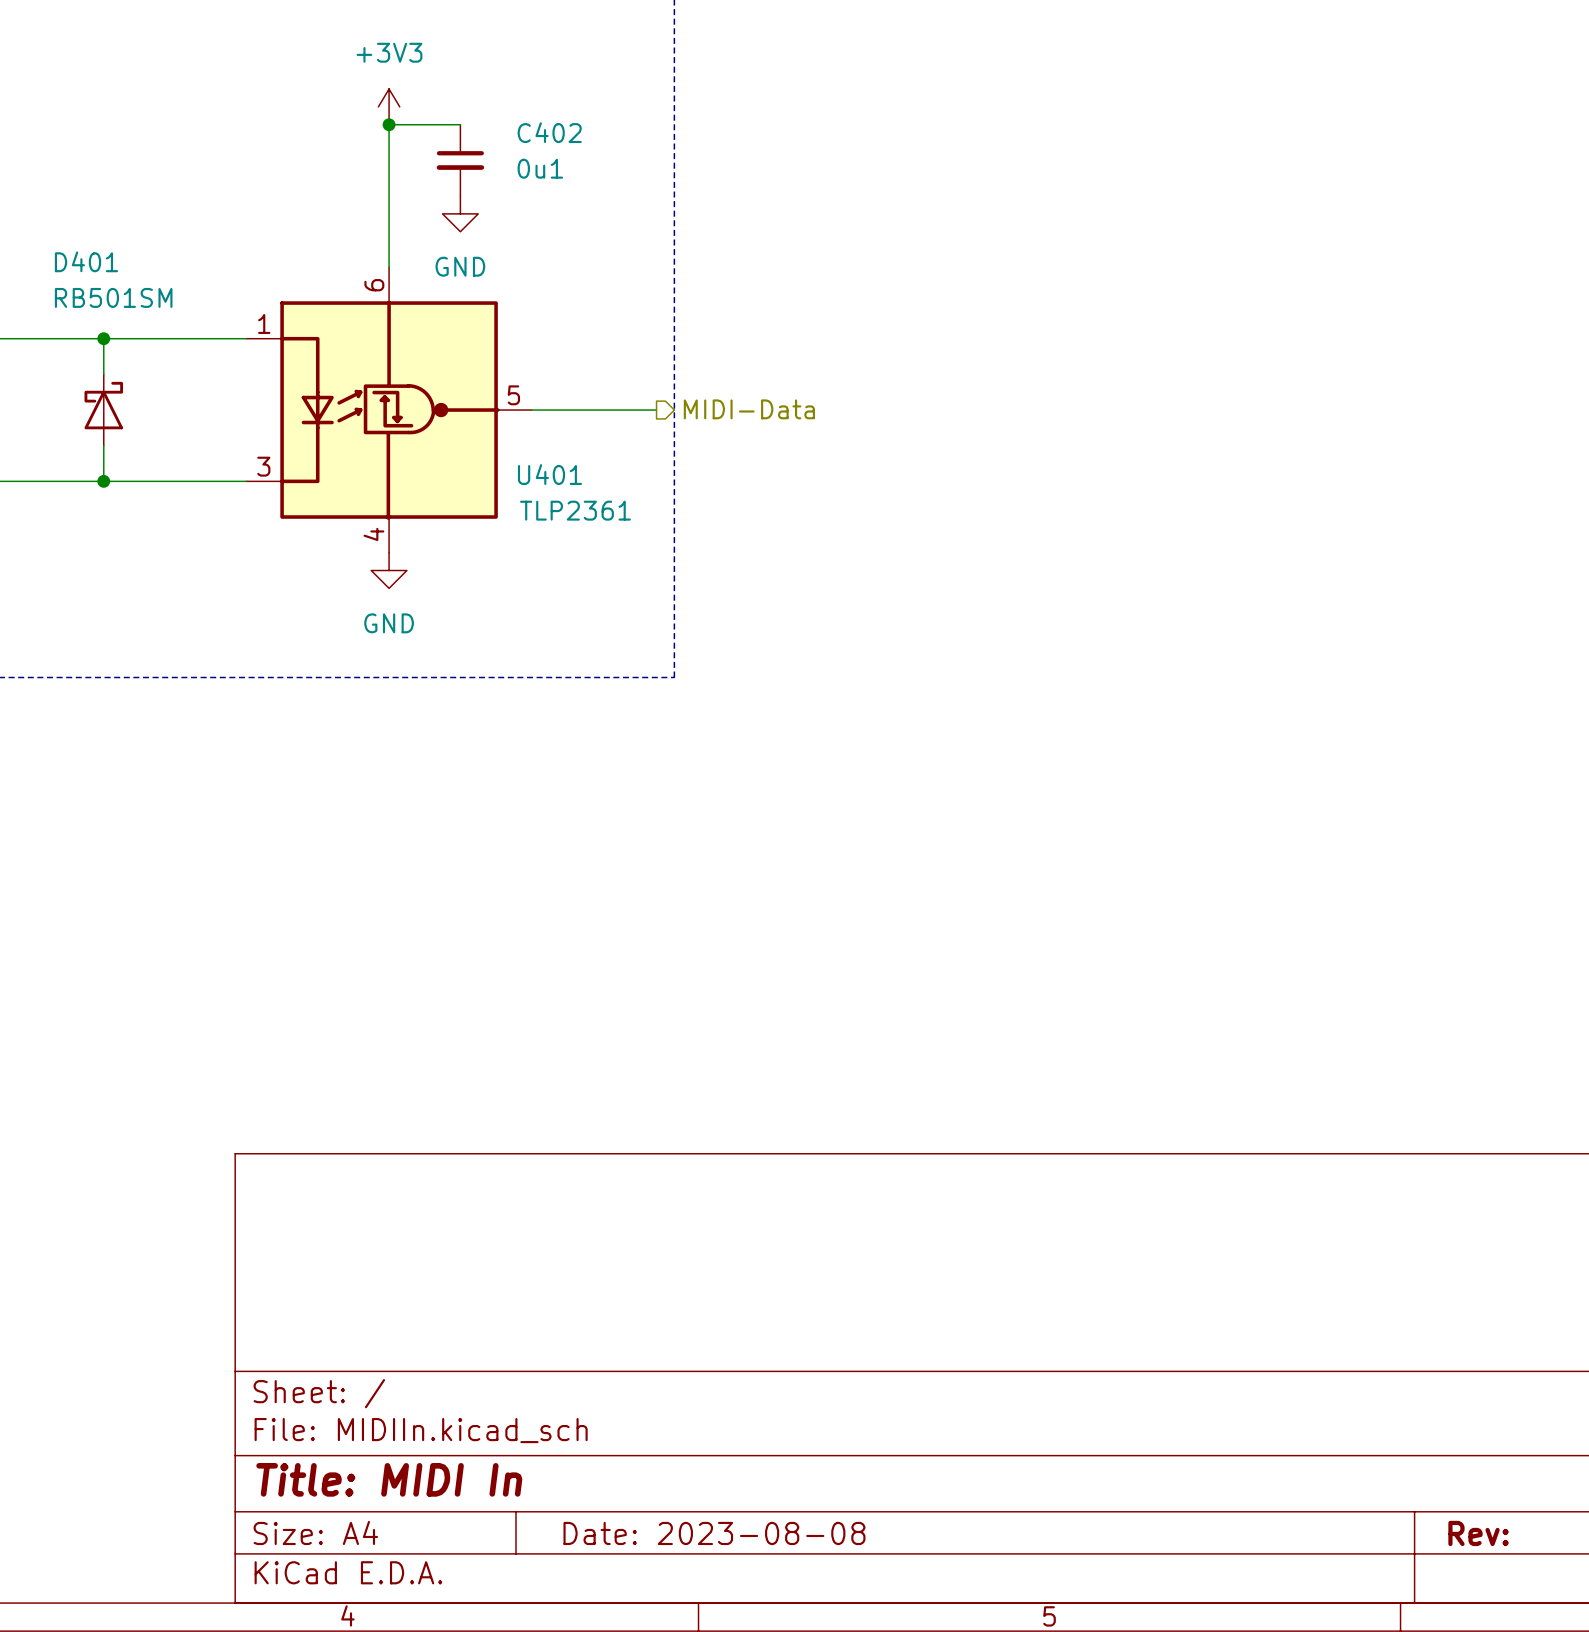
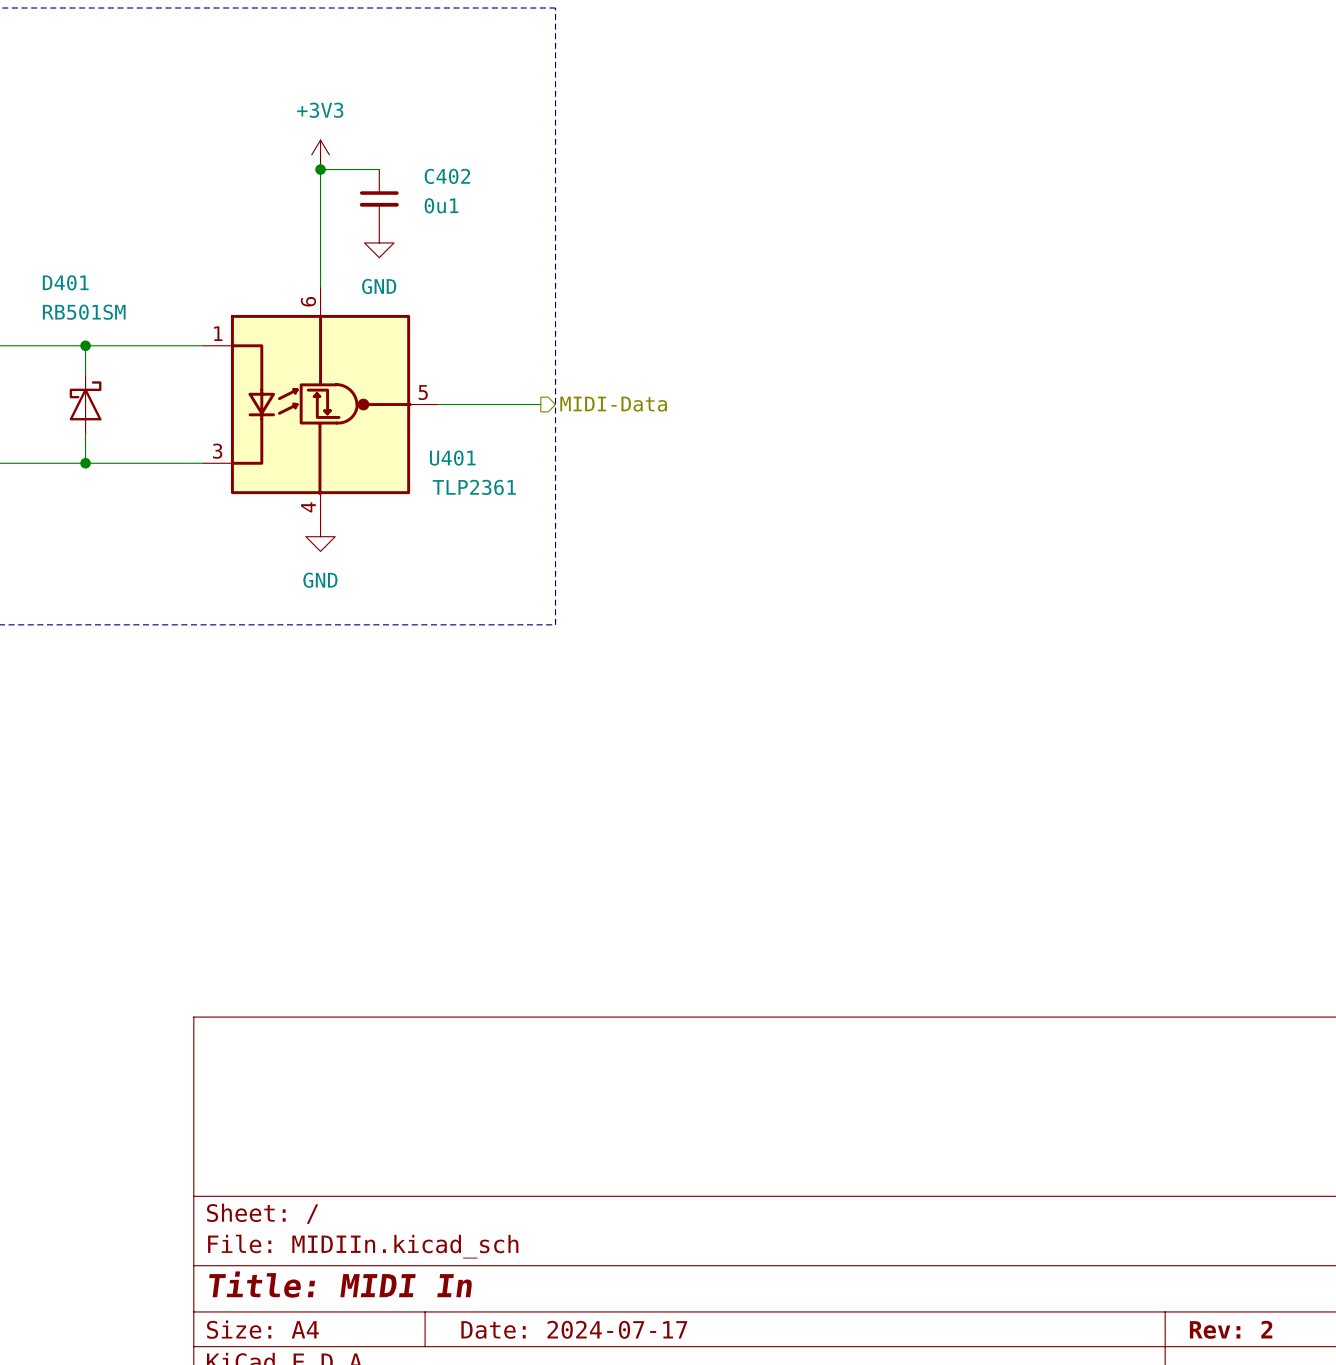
title block: Date: 2023-08-08 (714, 1533) -> Date: 2024-07-17 (574, 1329)
title block: Rev: (1478, 1533) -> Rev: 2 (1231, 1329)

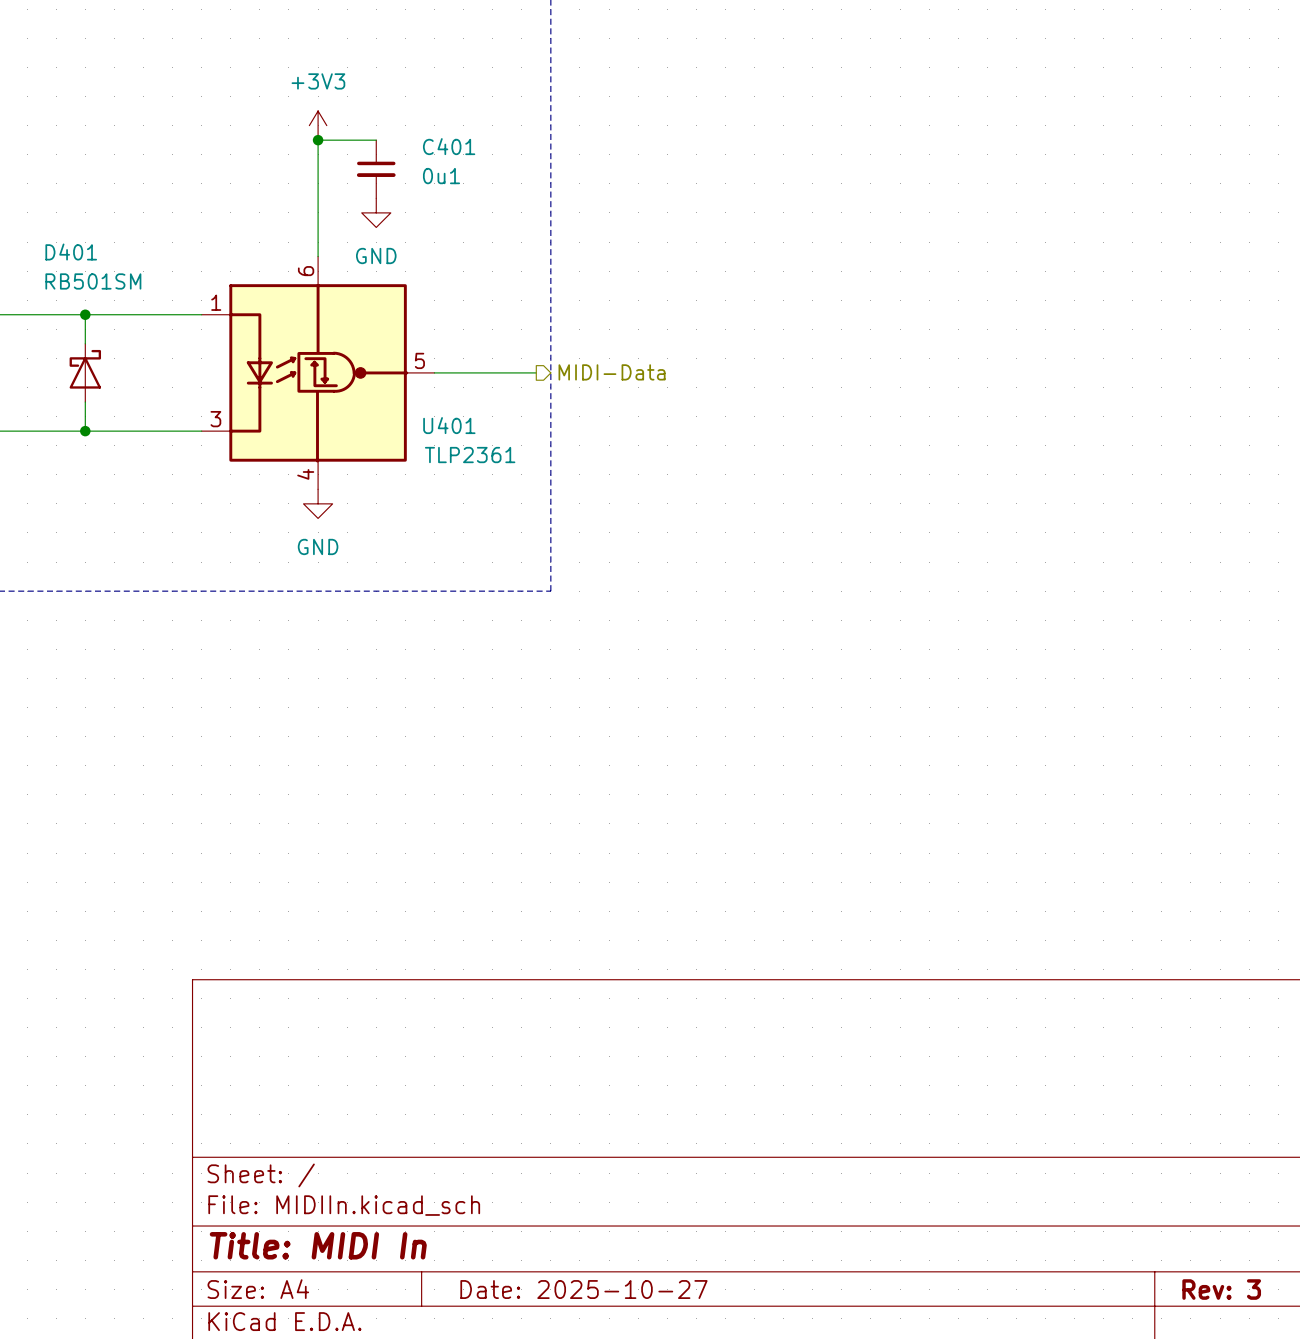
C402 name: C402 (447, 176) -> C401 (449, 146)
title block: Date: 2024-07-17 (574, 1329) -> Date: 2025-10-27 (583, 1289)
title block: Rev: 2 (1231, 1329) -> Rev: 3 (1221, 1289)

